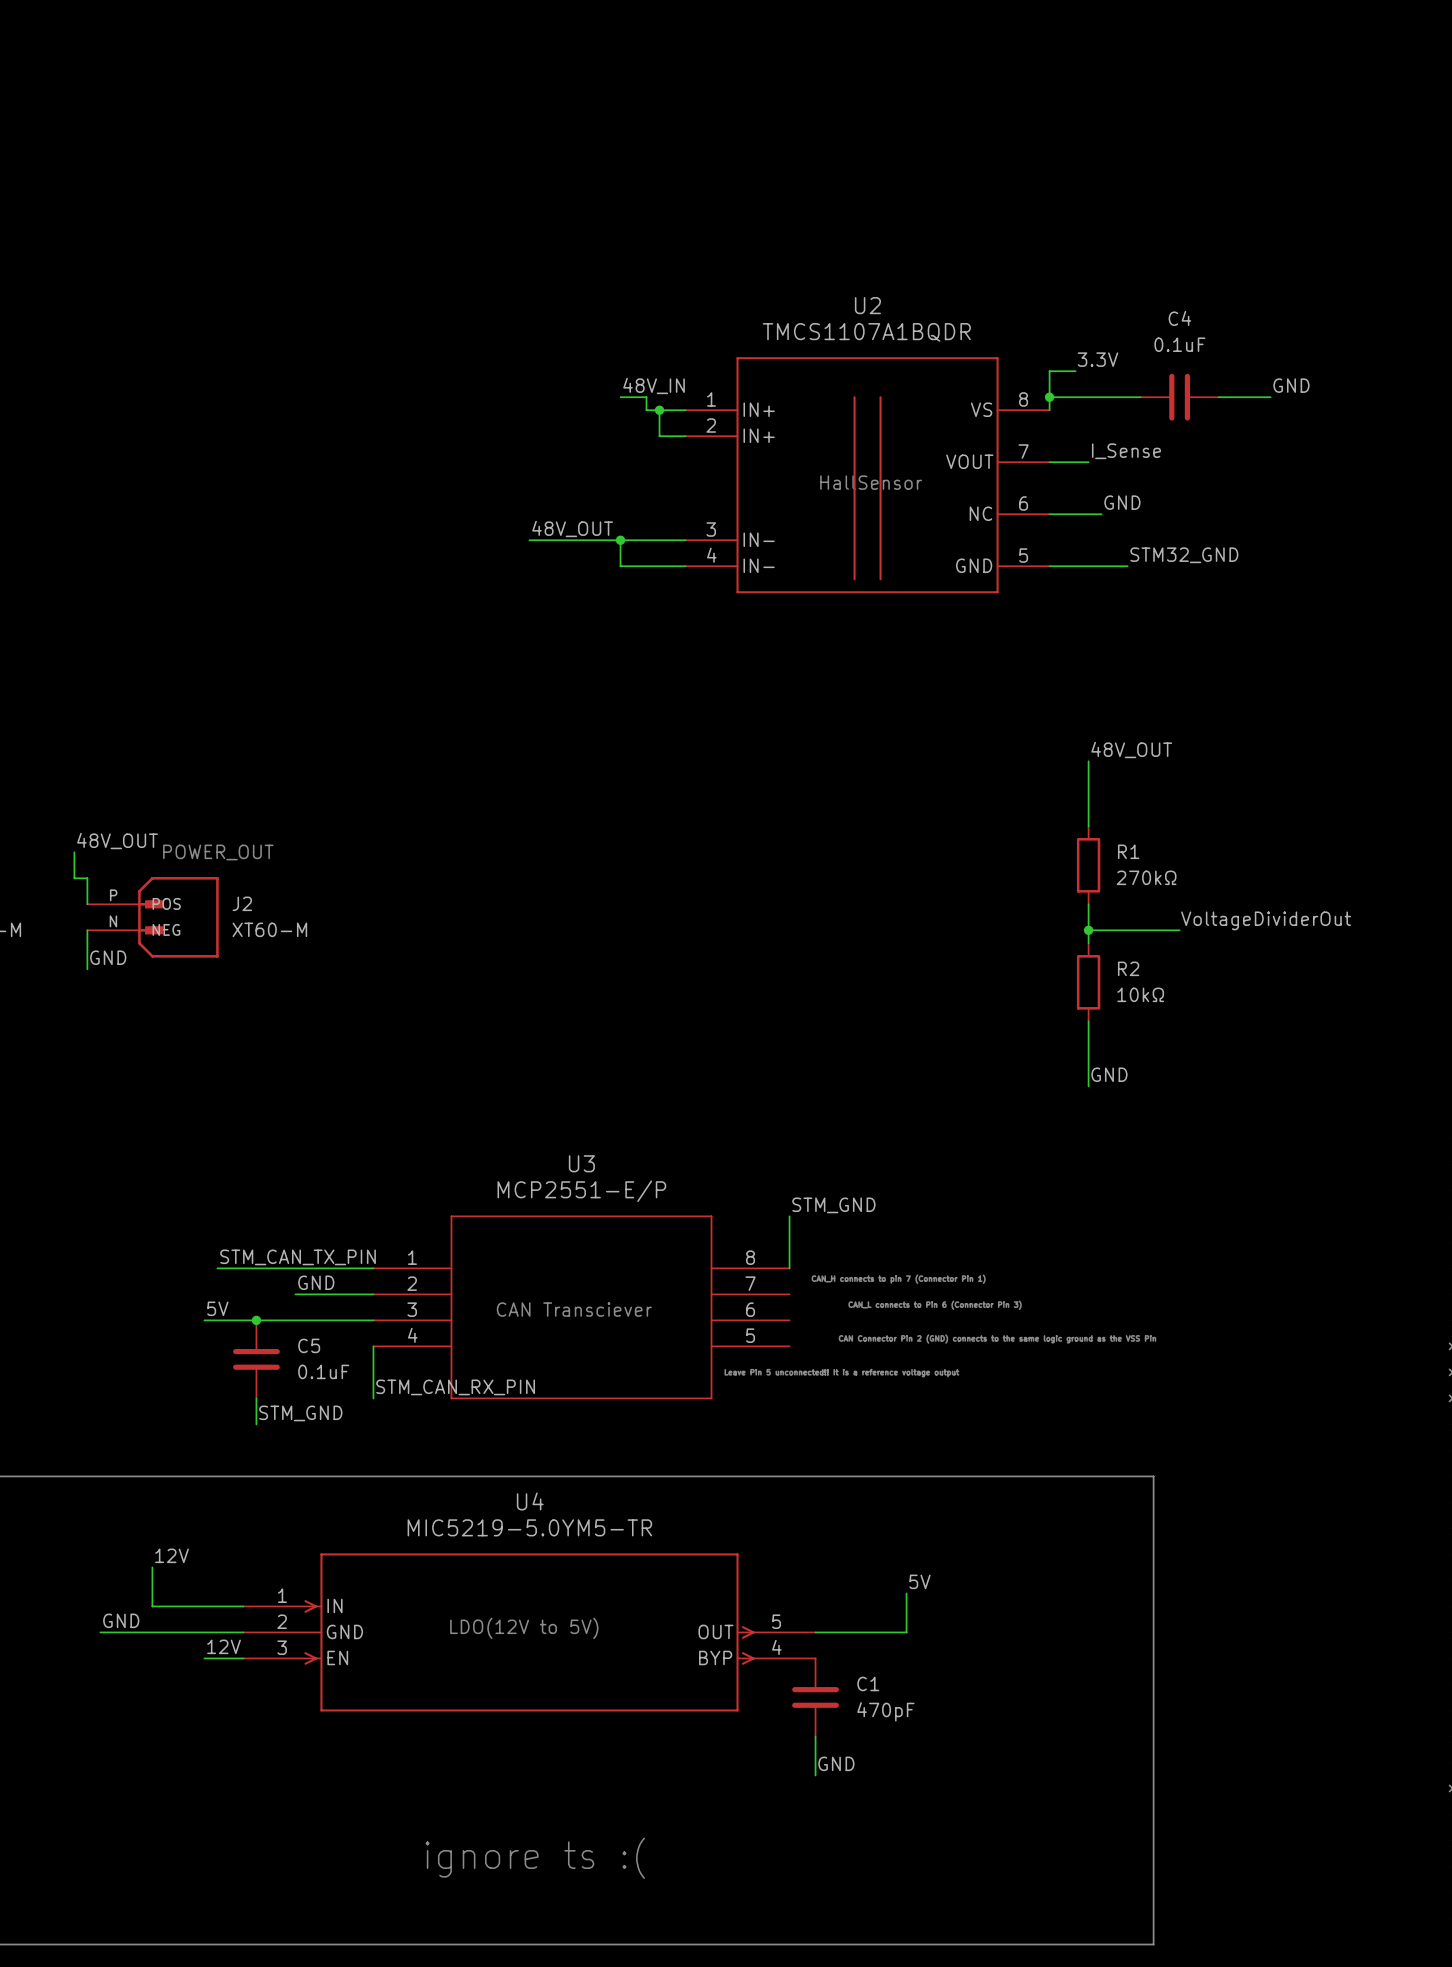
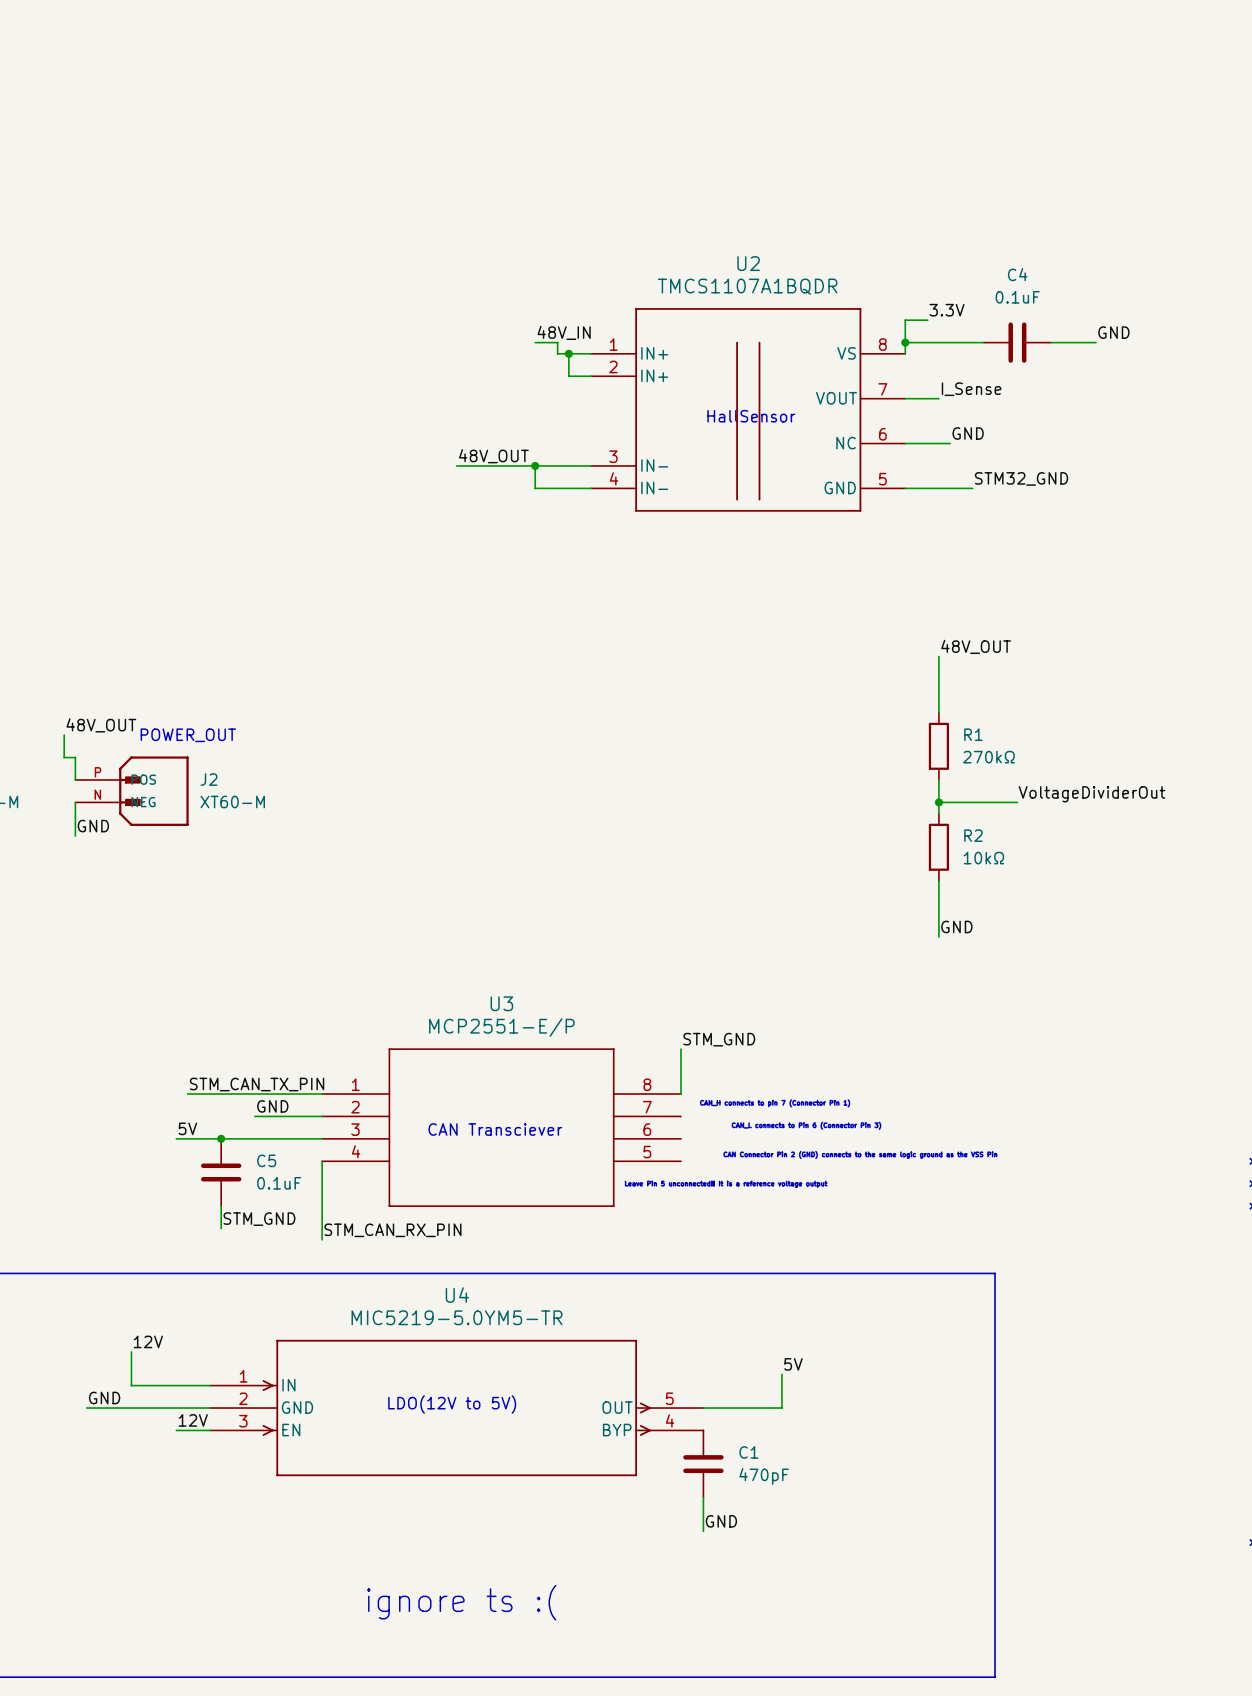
label position: STM_CAN_RX_PIN (455, 1387) -> STM_CAN_RX_PIN (392, 1230)
wire: none -> (322, 1206) (322, 1239)

